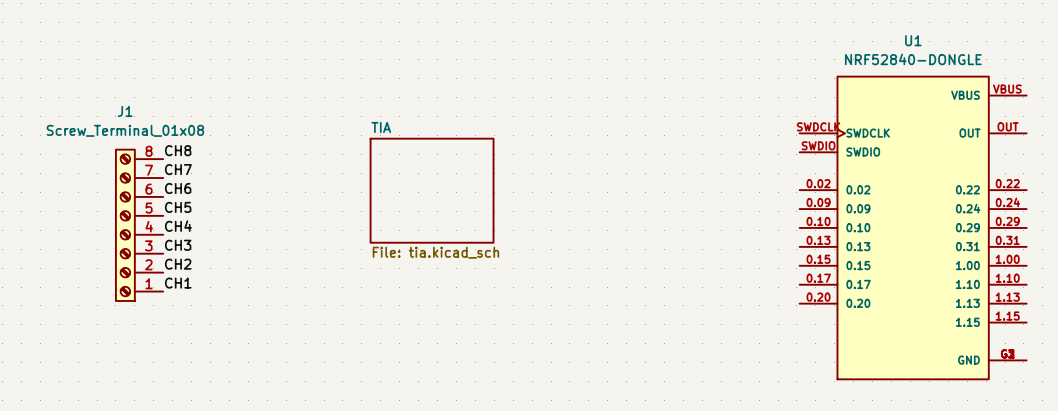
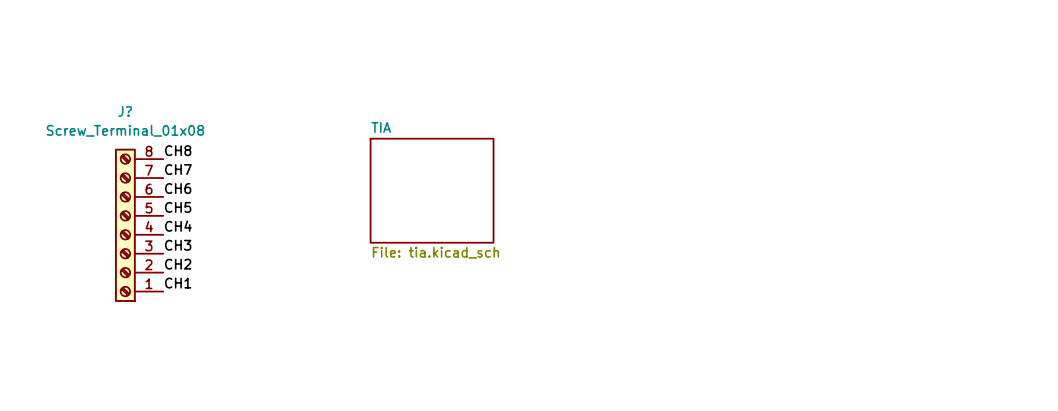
J1 name: J1 (125, 111) -> J? (125, 111)
U1: NRF52840-DONGLE (913, 227) -> none

